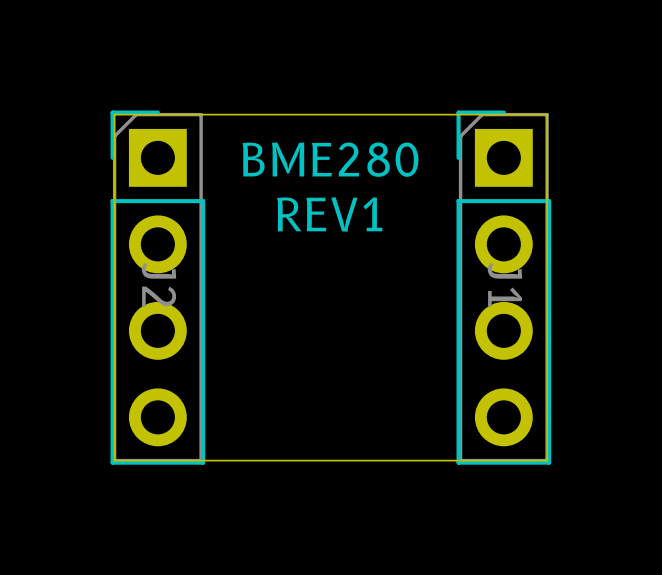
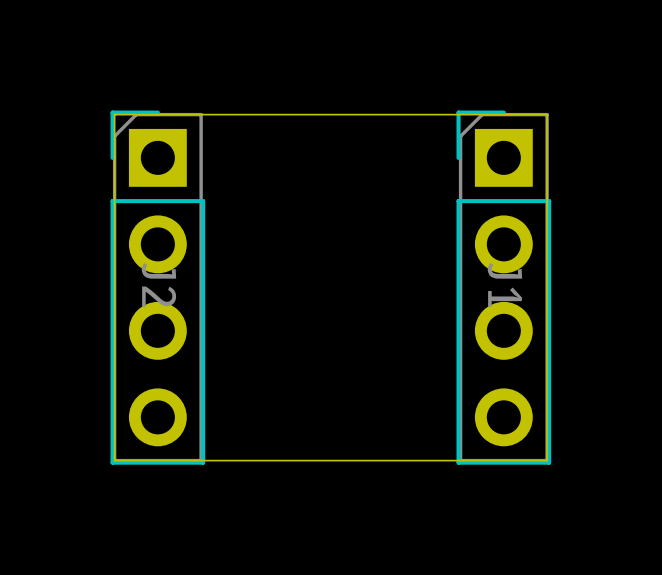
text: BME280 (330, 159) -> none
text: REV1 (329, 214) -> none

